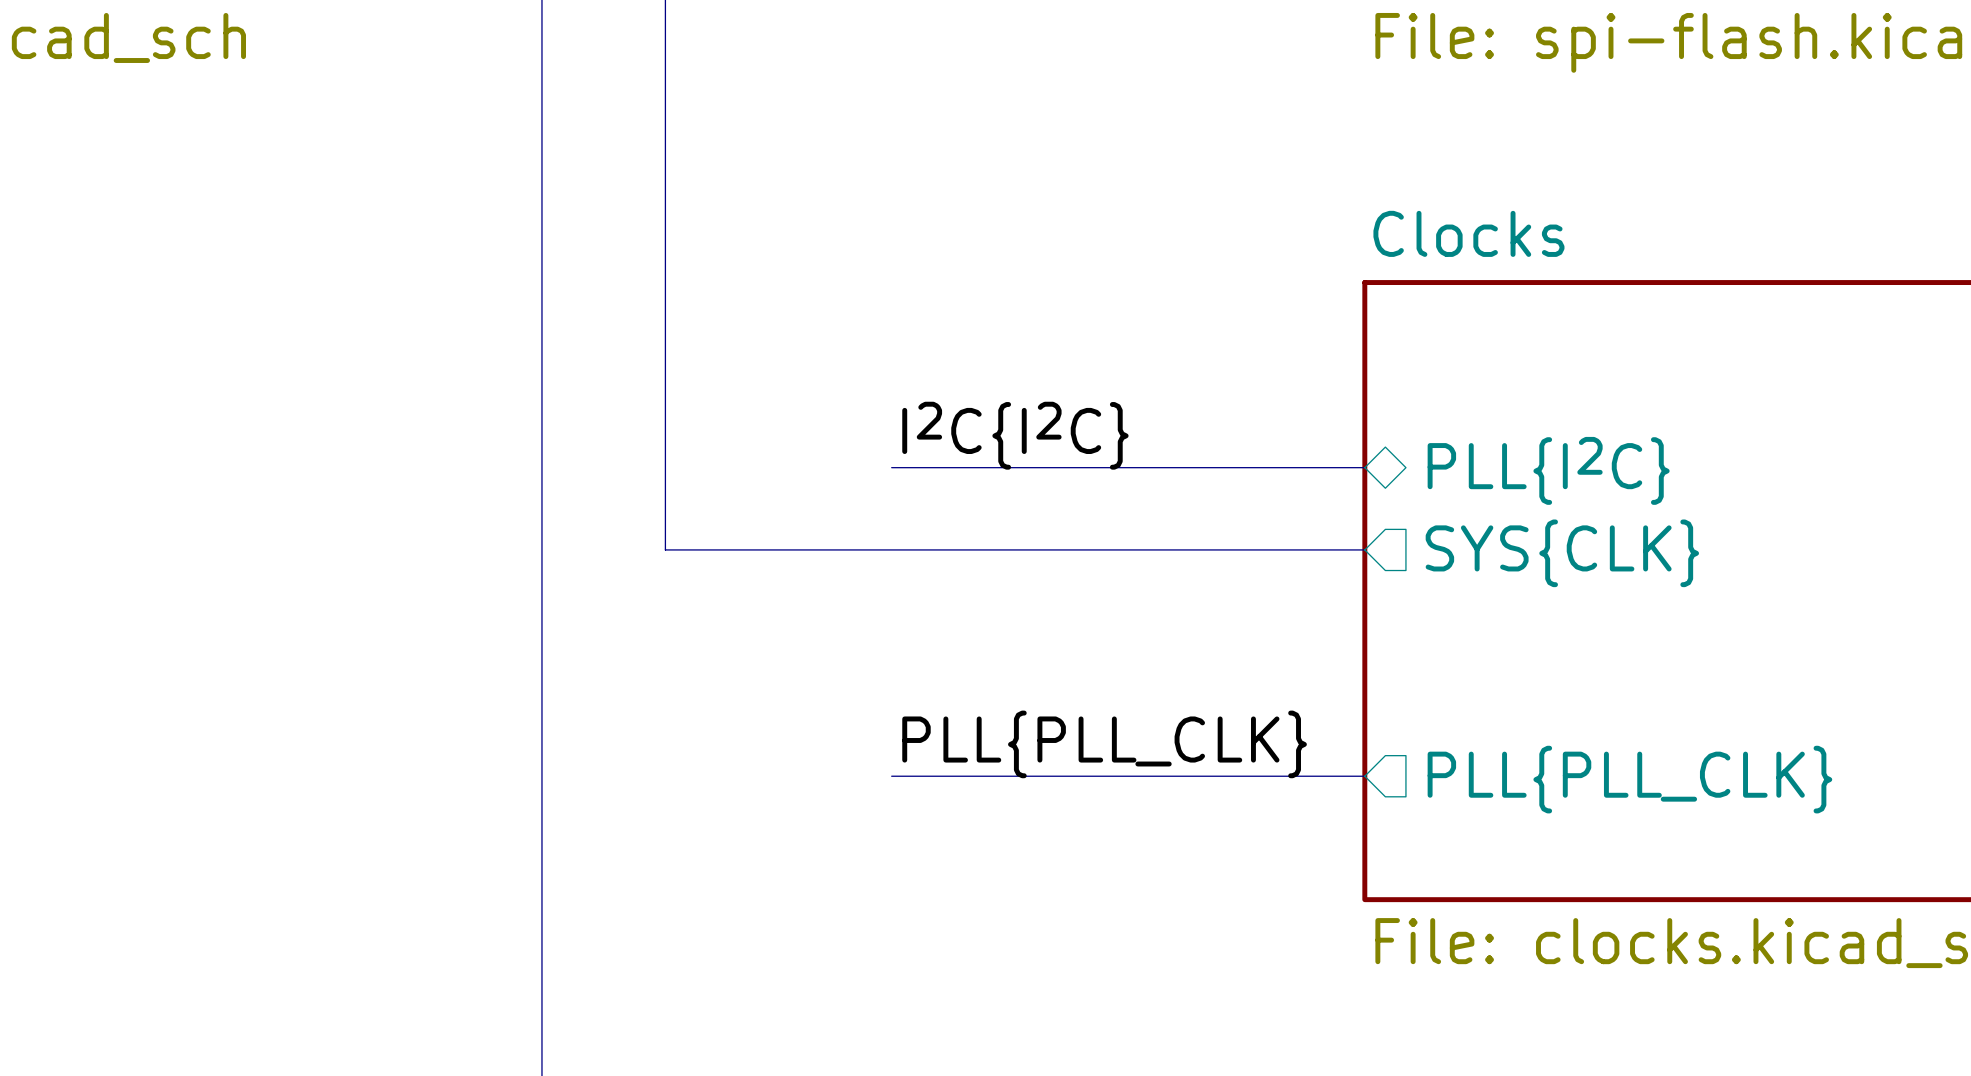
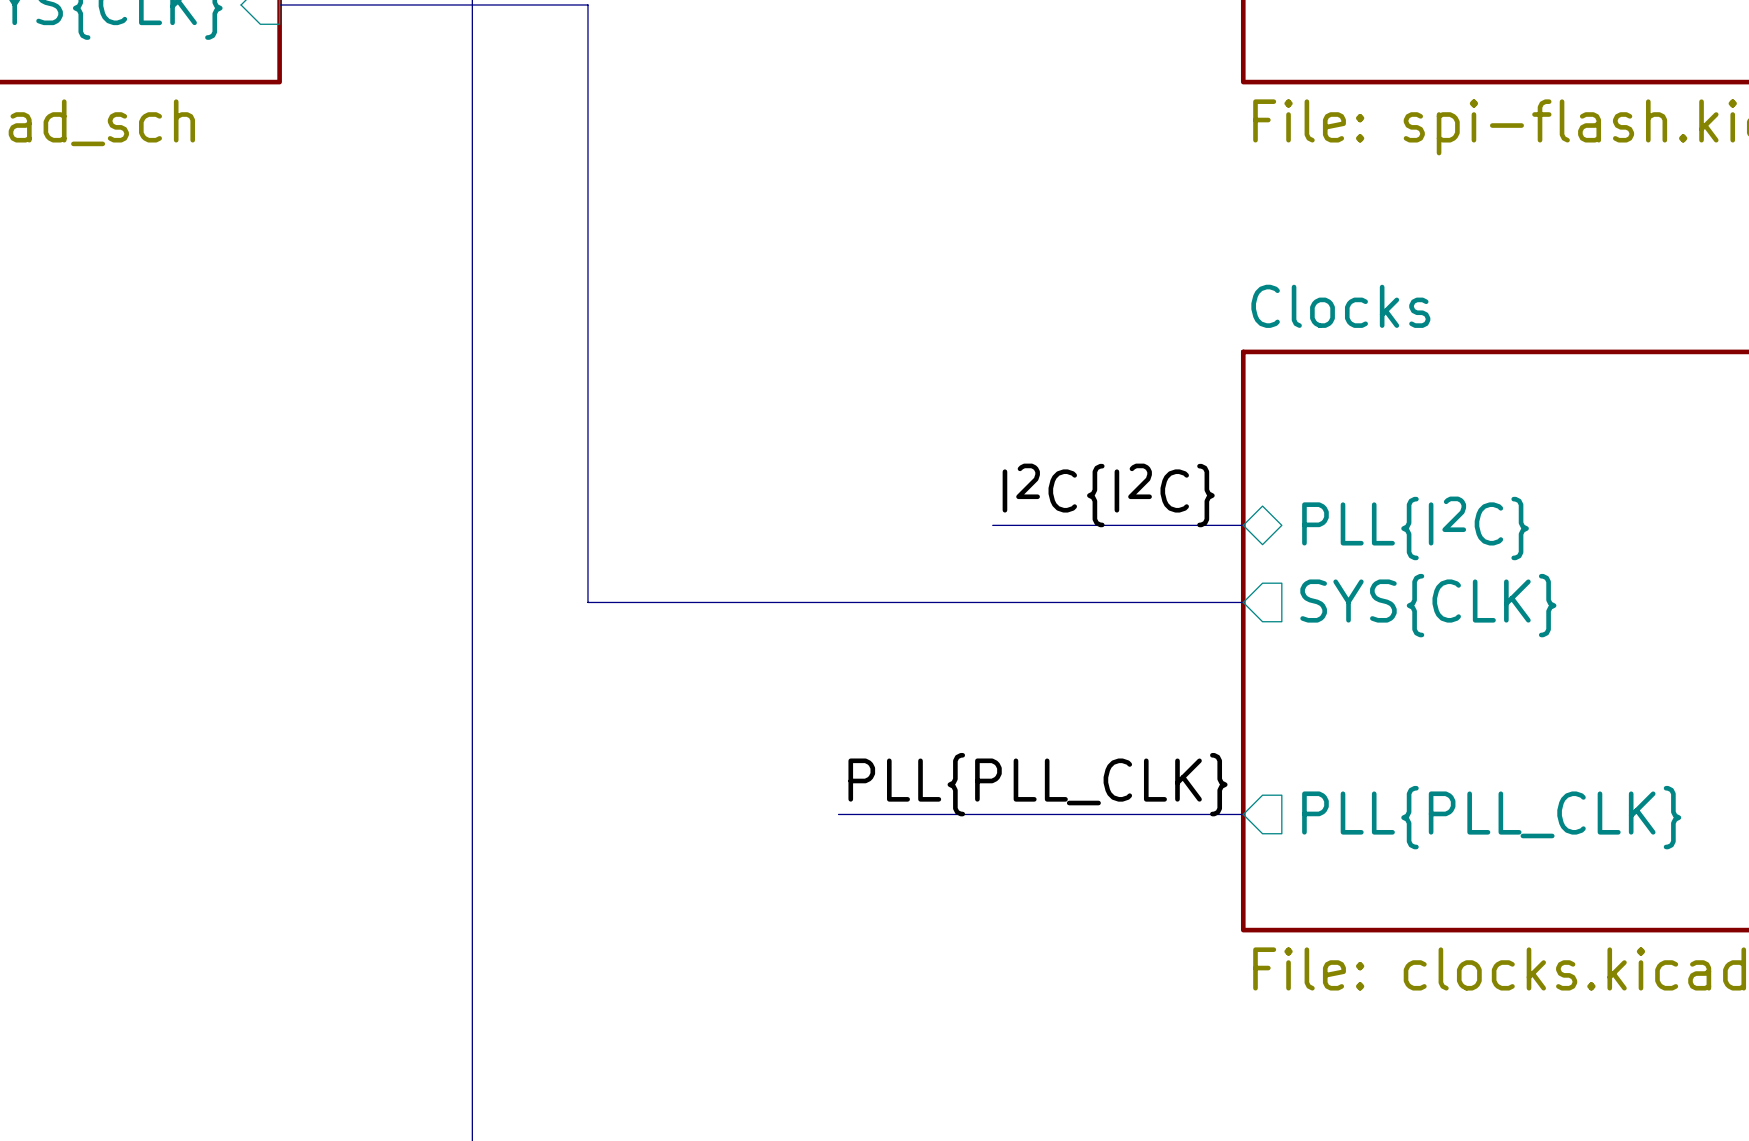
label position: I2C{I2C} (1015, 435) -> I2C{I2C} (1108, 495)
bus: (891, 467) (1097, 467) -> none
label position: PLL{PLL_CLK} (1104, 744) -> PLL{PLL_CLK} (1037, 784)
bus: (891, 776) (932, 776) -> none

